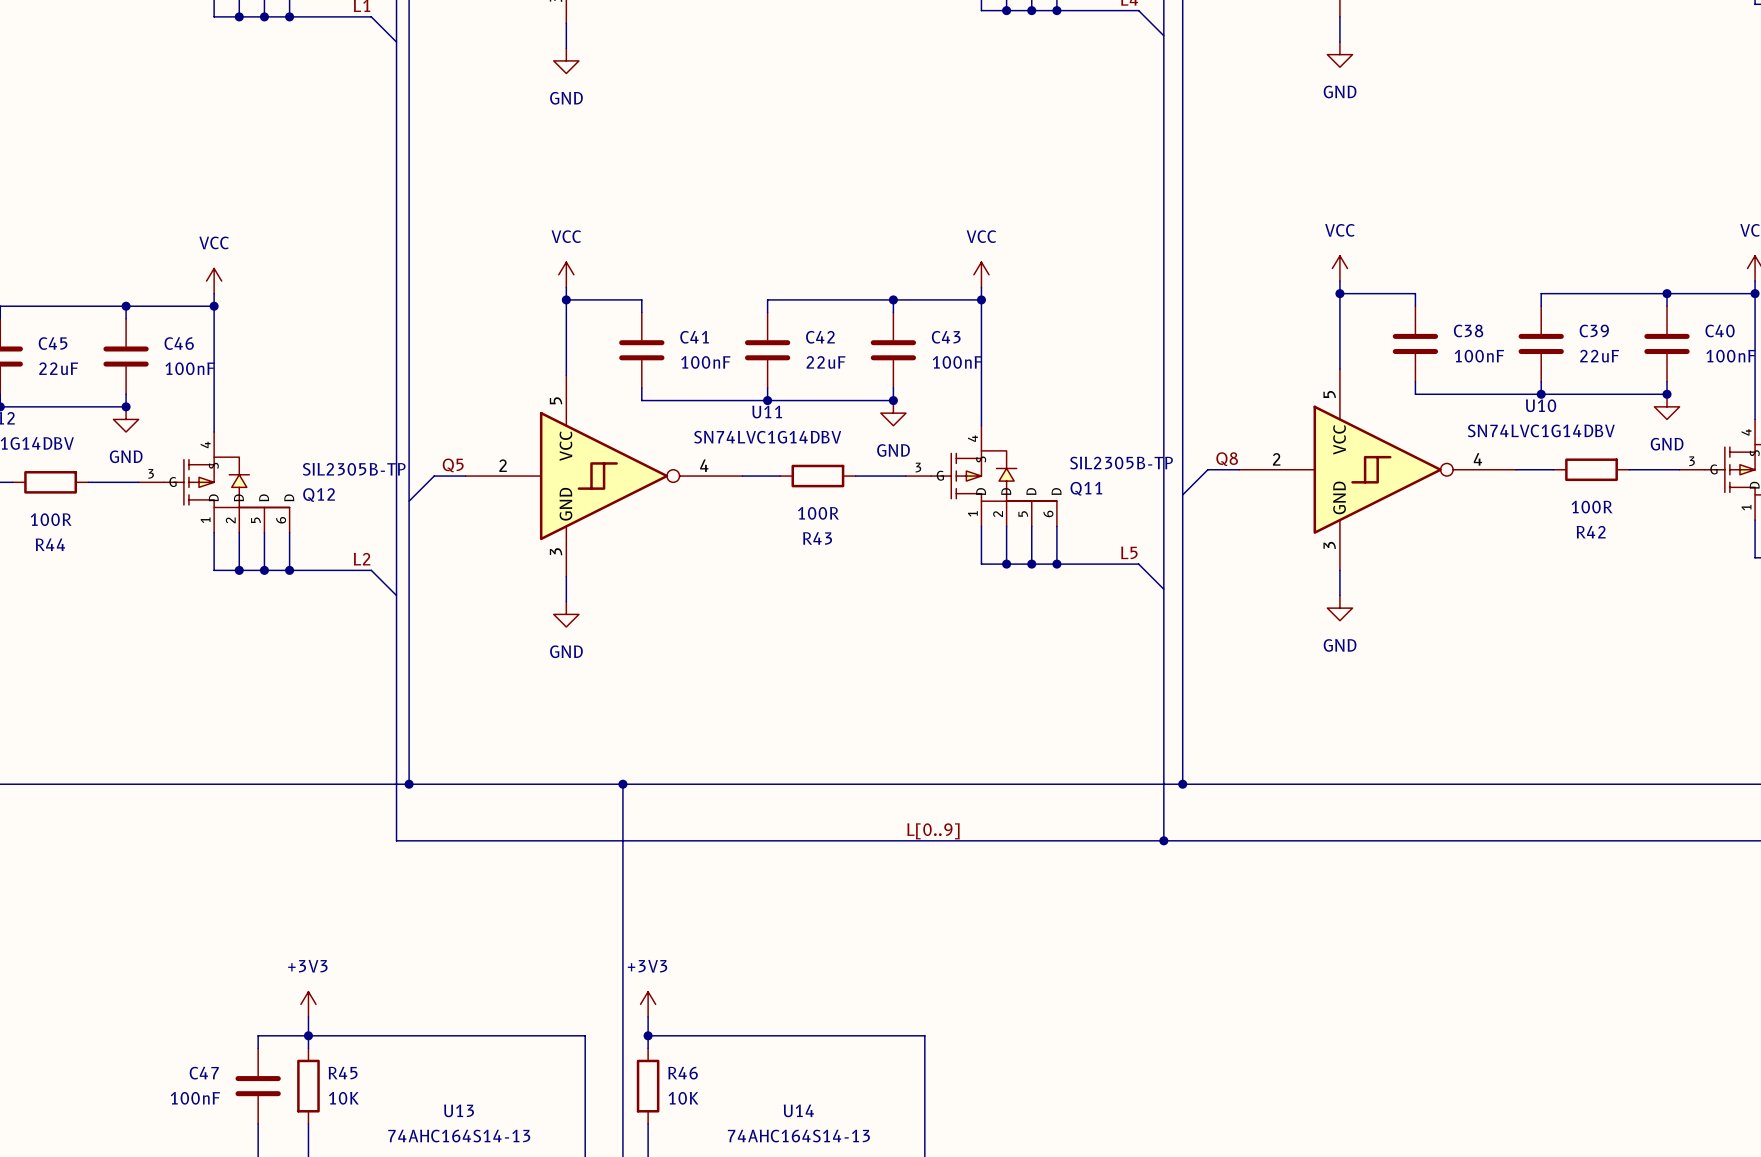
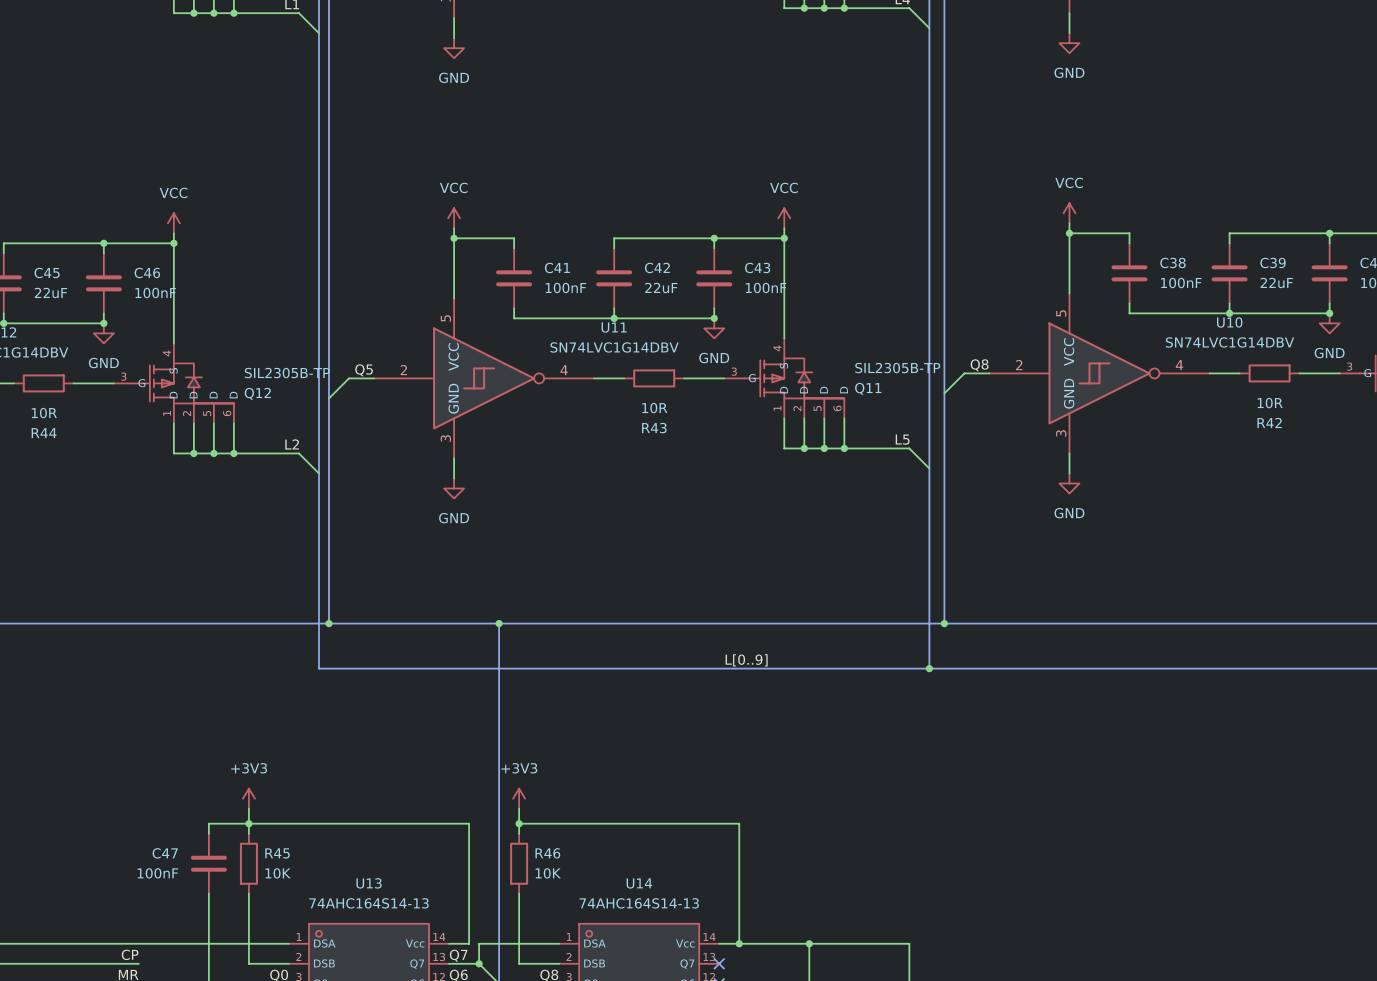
R42 value: 100R (1592, 507) -> 10R (1270, 403)
R43 value: 100R (818, 513) -> 10R (654, 408)
R44 value: 100R (51, 519) -> 10R (44, 413)

